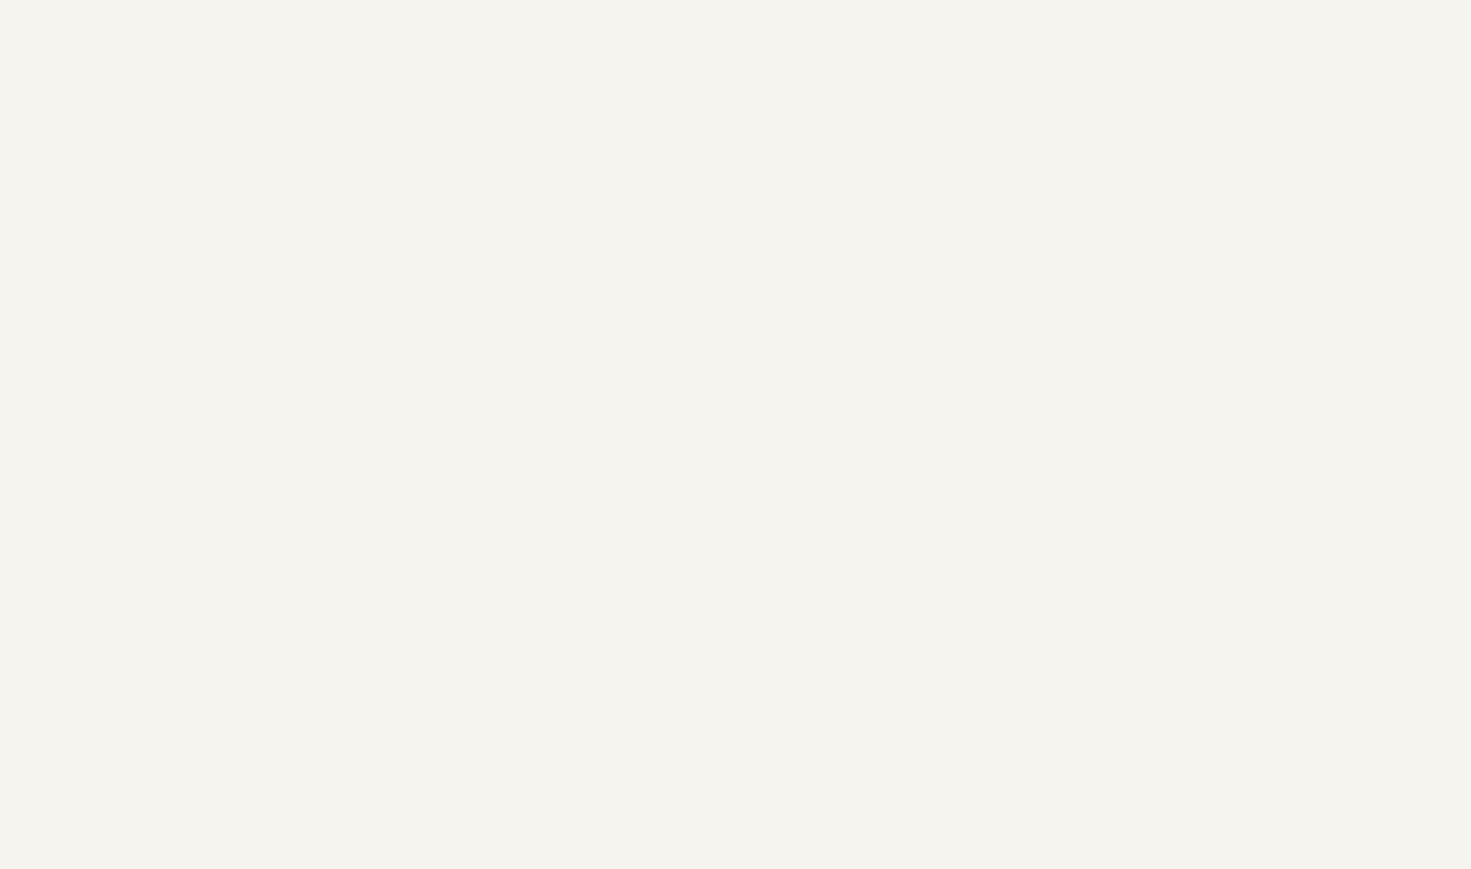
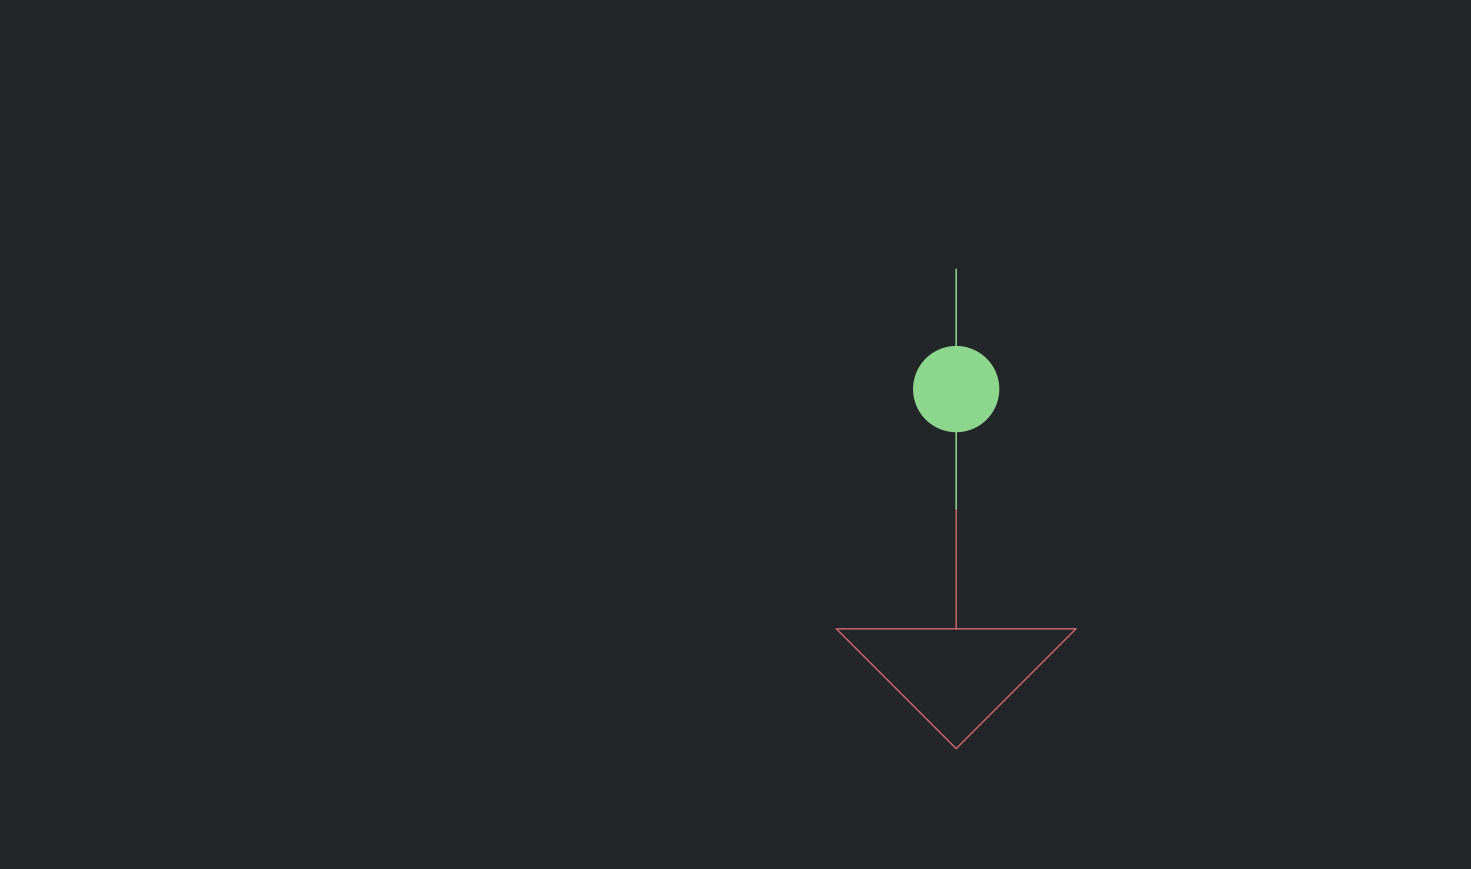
wire: none -> (956, 269) (956, 508)
junction: none -> (956, 389)
power symbol: none -> (956, 628)

